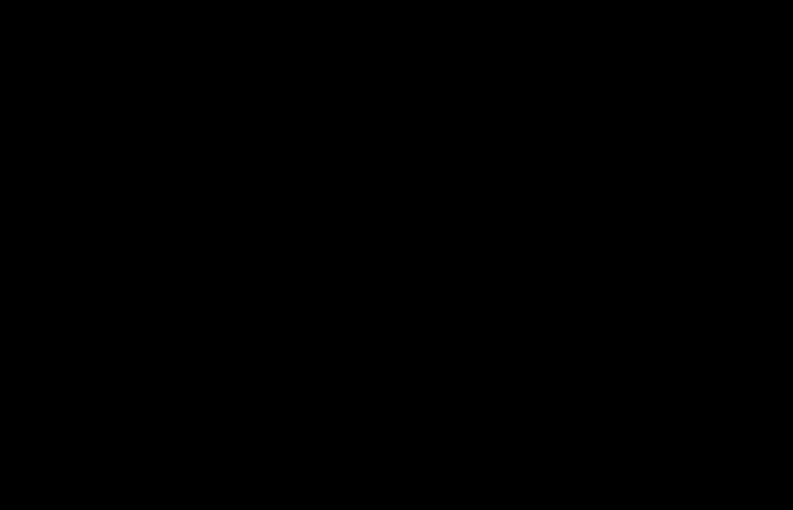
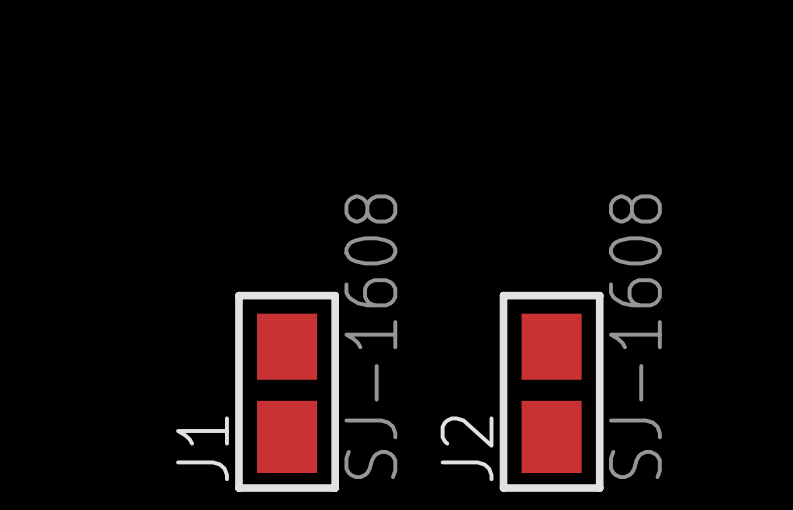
J1: none -> SJ-1608 (287, 391)
J2: none -> SJ-1608 (551, 391)

